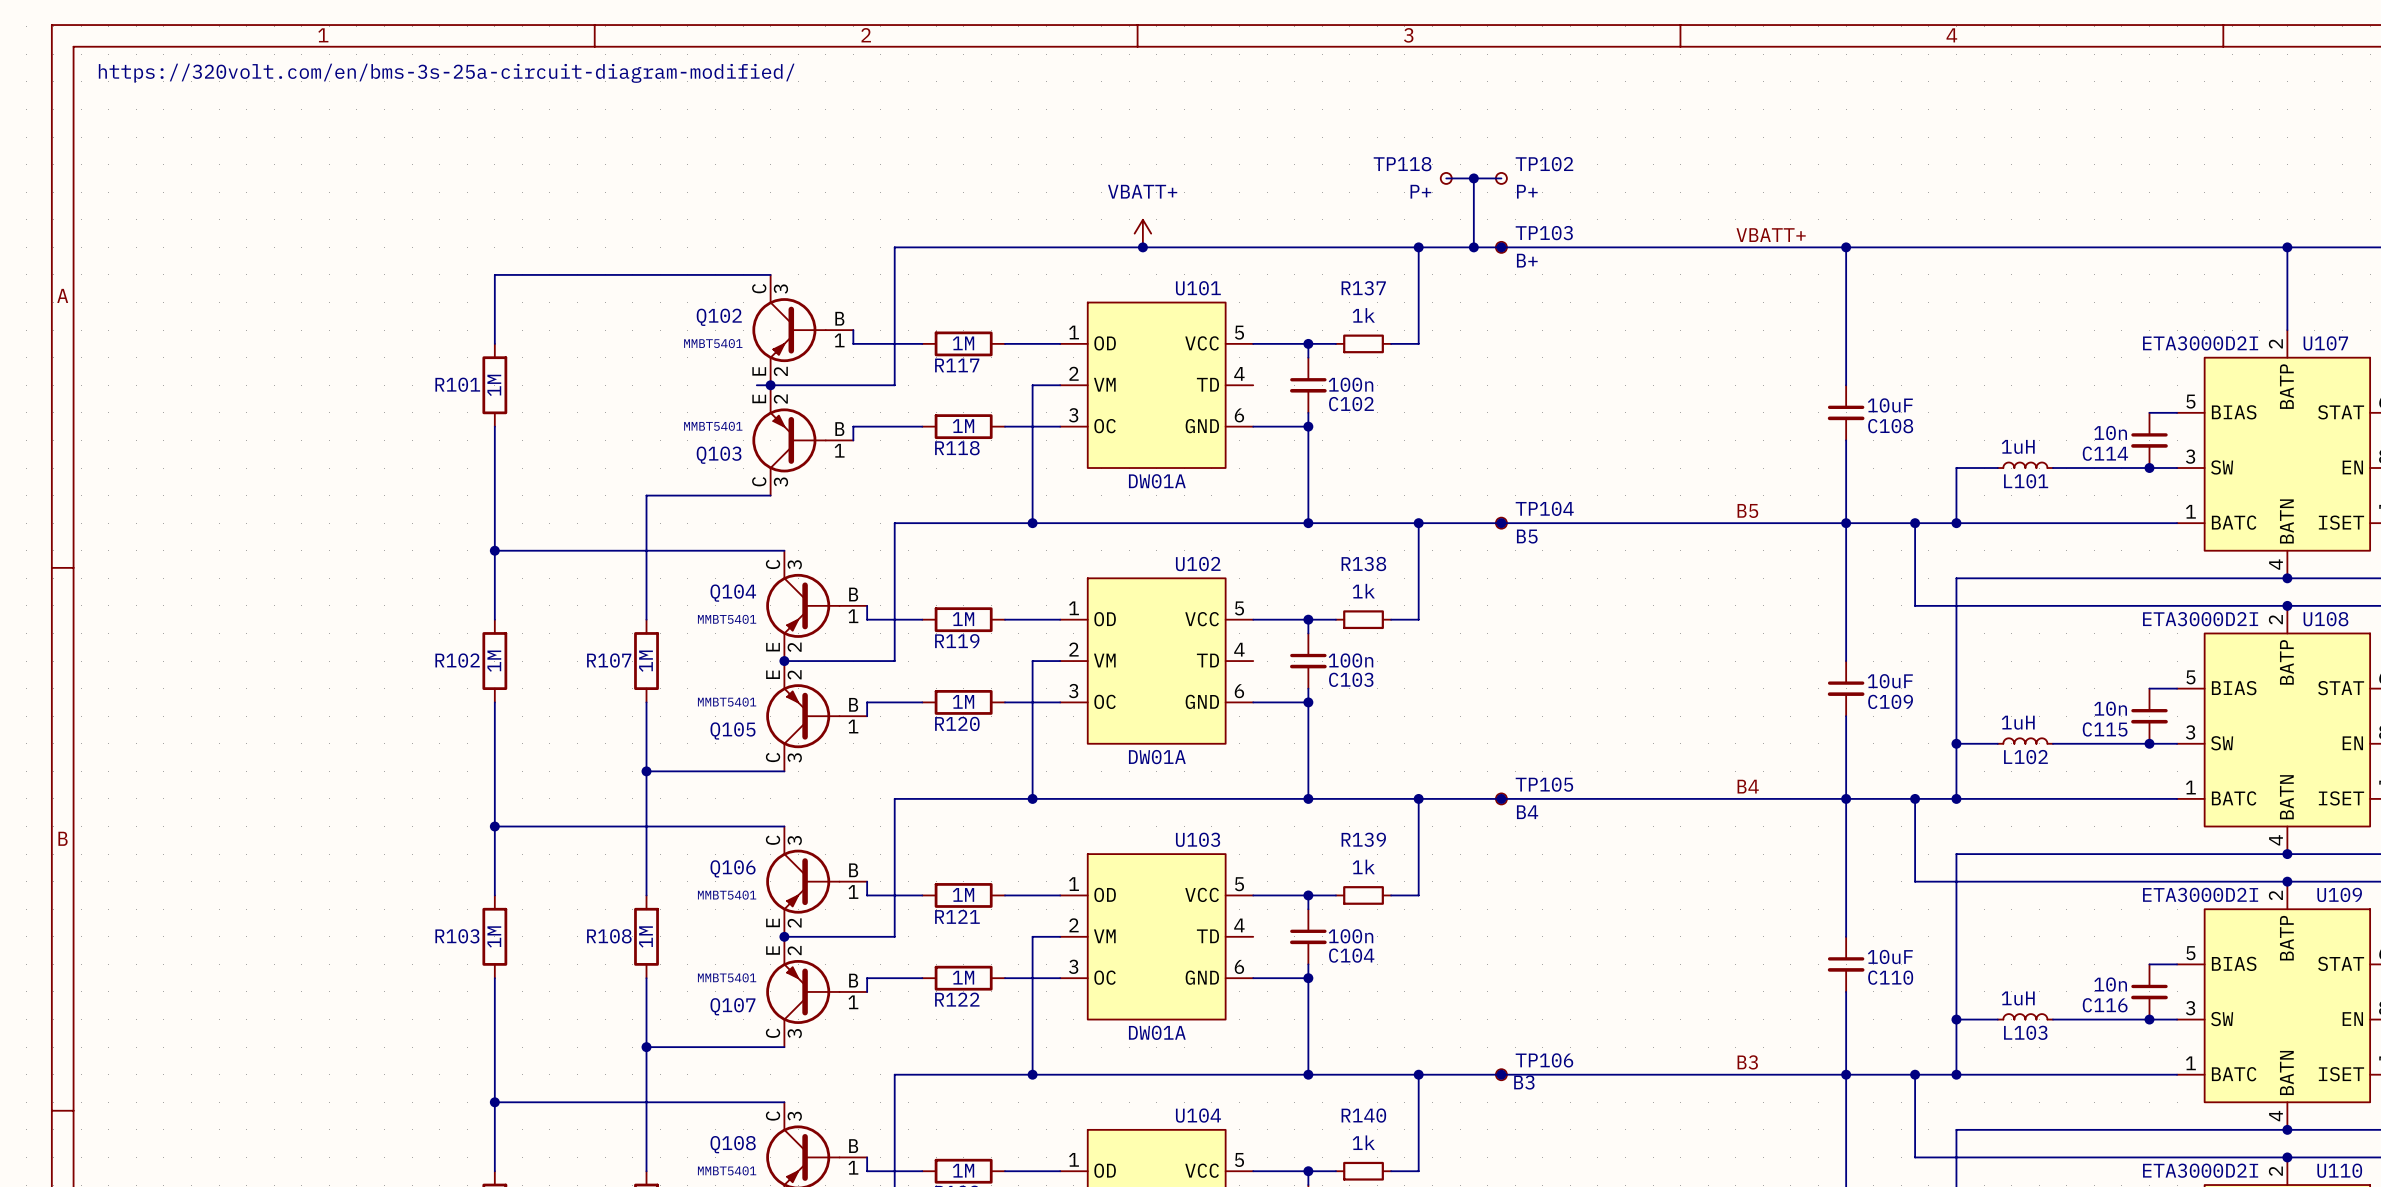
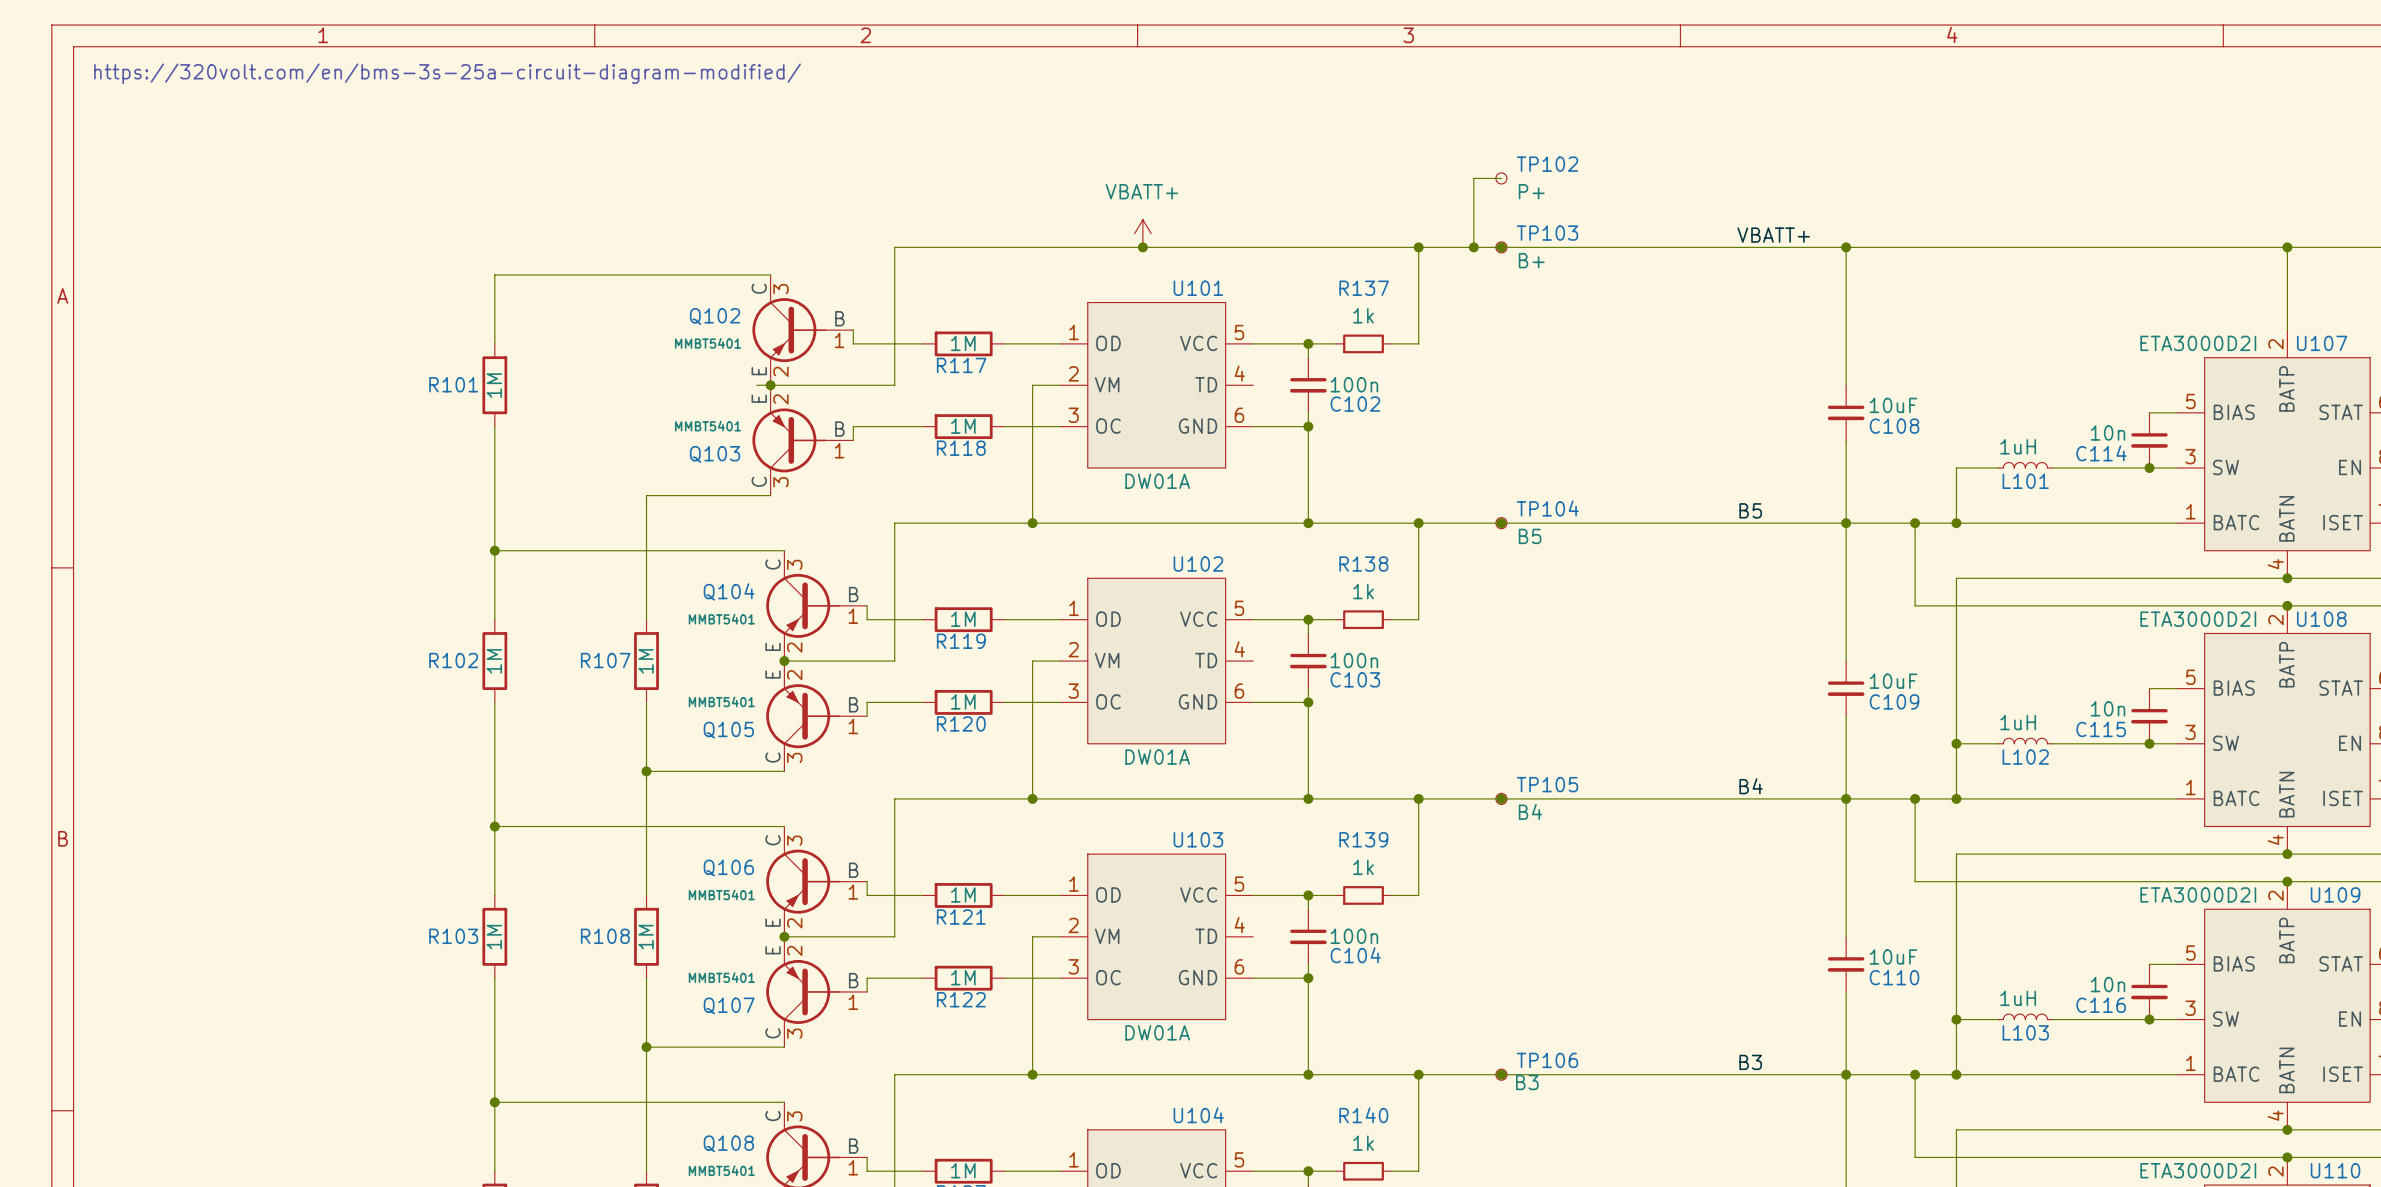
wire: (1446, 178) (1473, 178) -> none
TP118: P+ (1446, 178) -> none
junction: (1473, 178) -> none

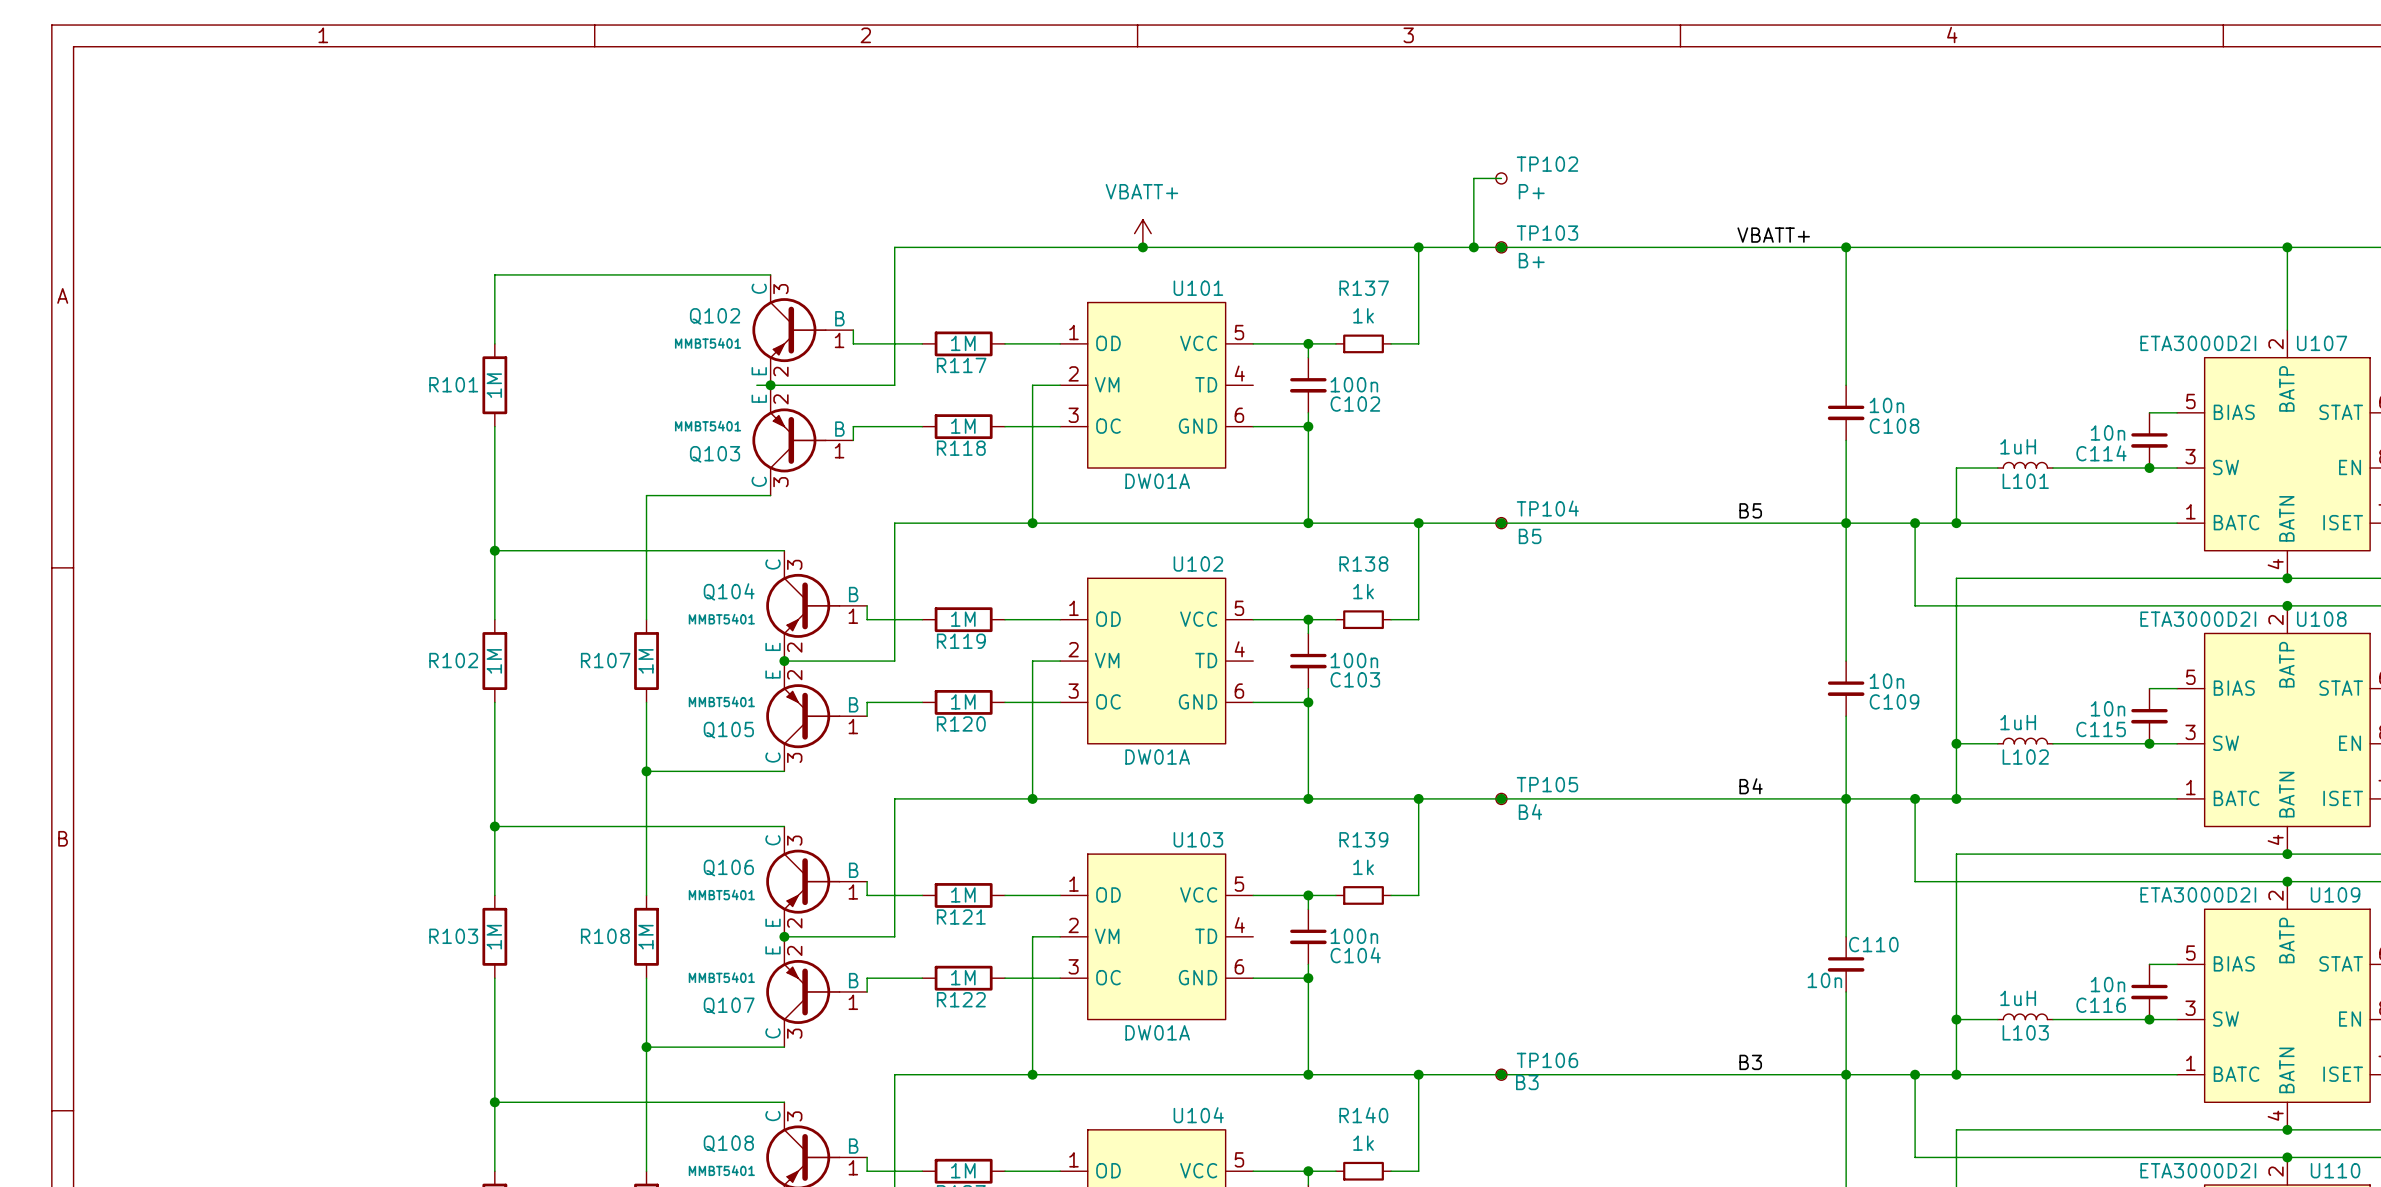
text: https://320volt.com/en/bms-3s-25a-circuit-diagram-modified/ (447, 73) -> none
C108 value: 10uF (1893, 405) -> 10n (1886, 405)
C109 value: 10uF (1893, 681) -> 10n (1886, 681)
C110 value: 10uF (1893, 956) -> 10n (1824, 980)
C110 name position: C110 (1894, 977) -> C110 (1873, 944)

